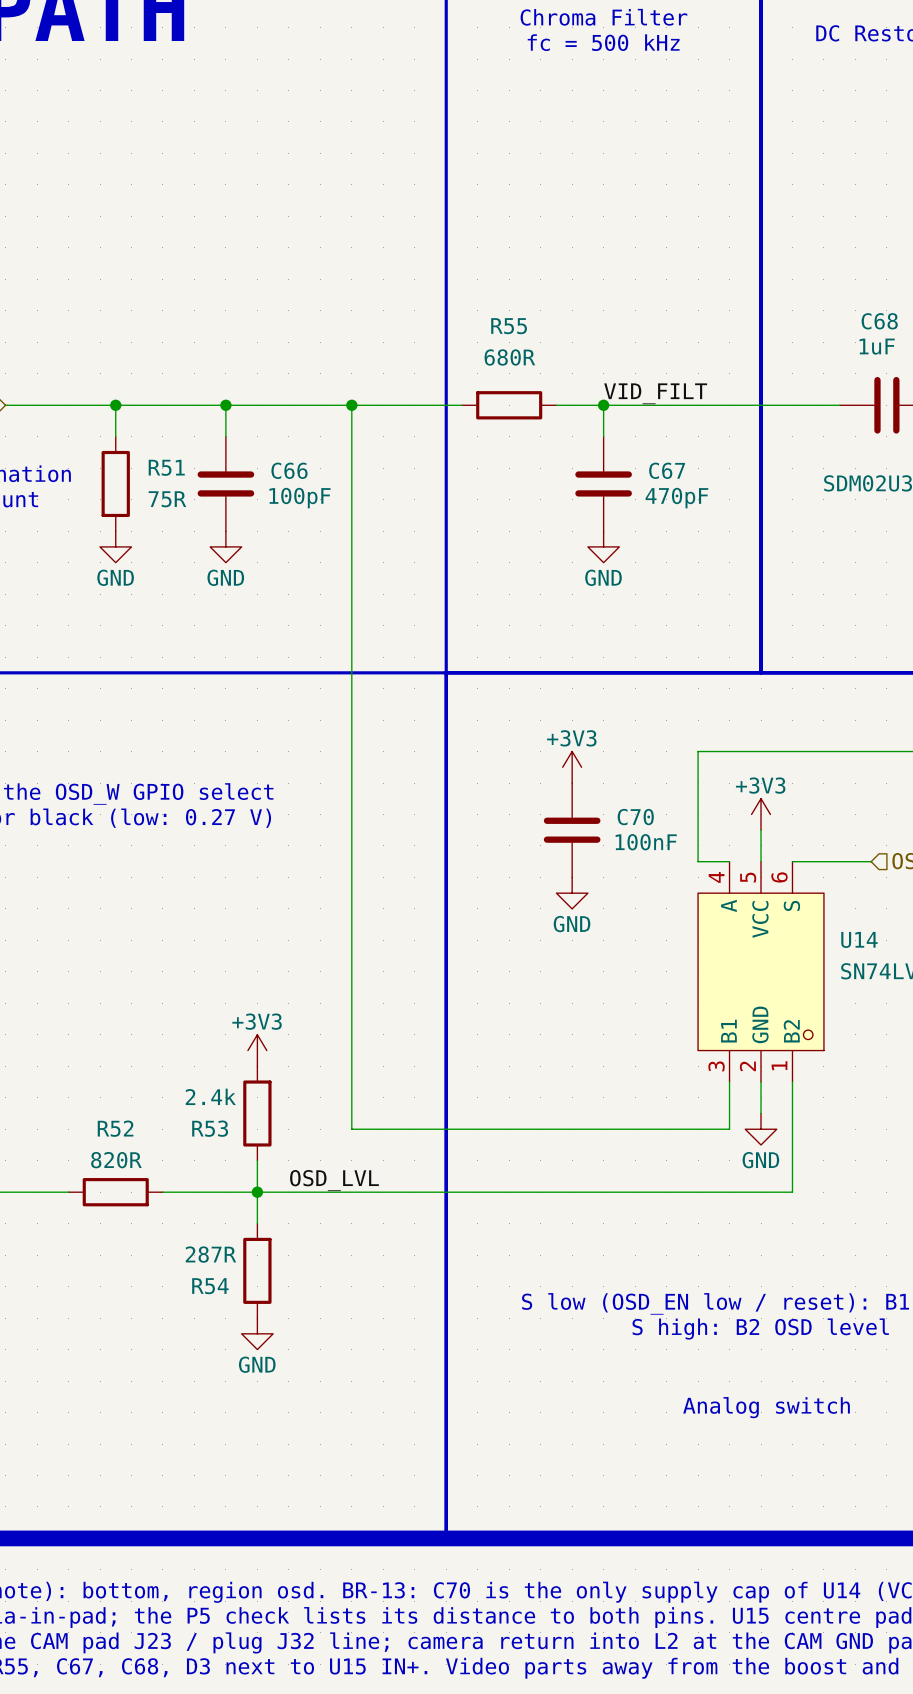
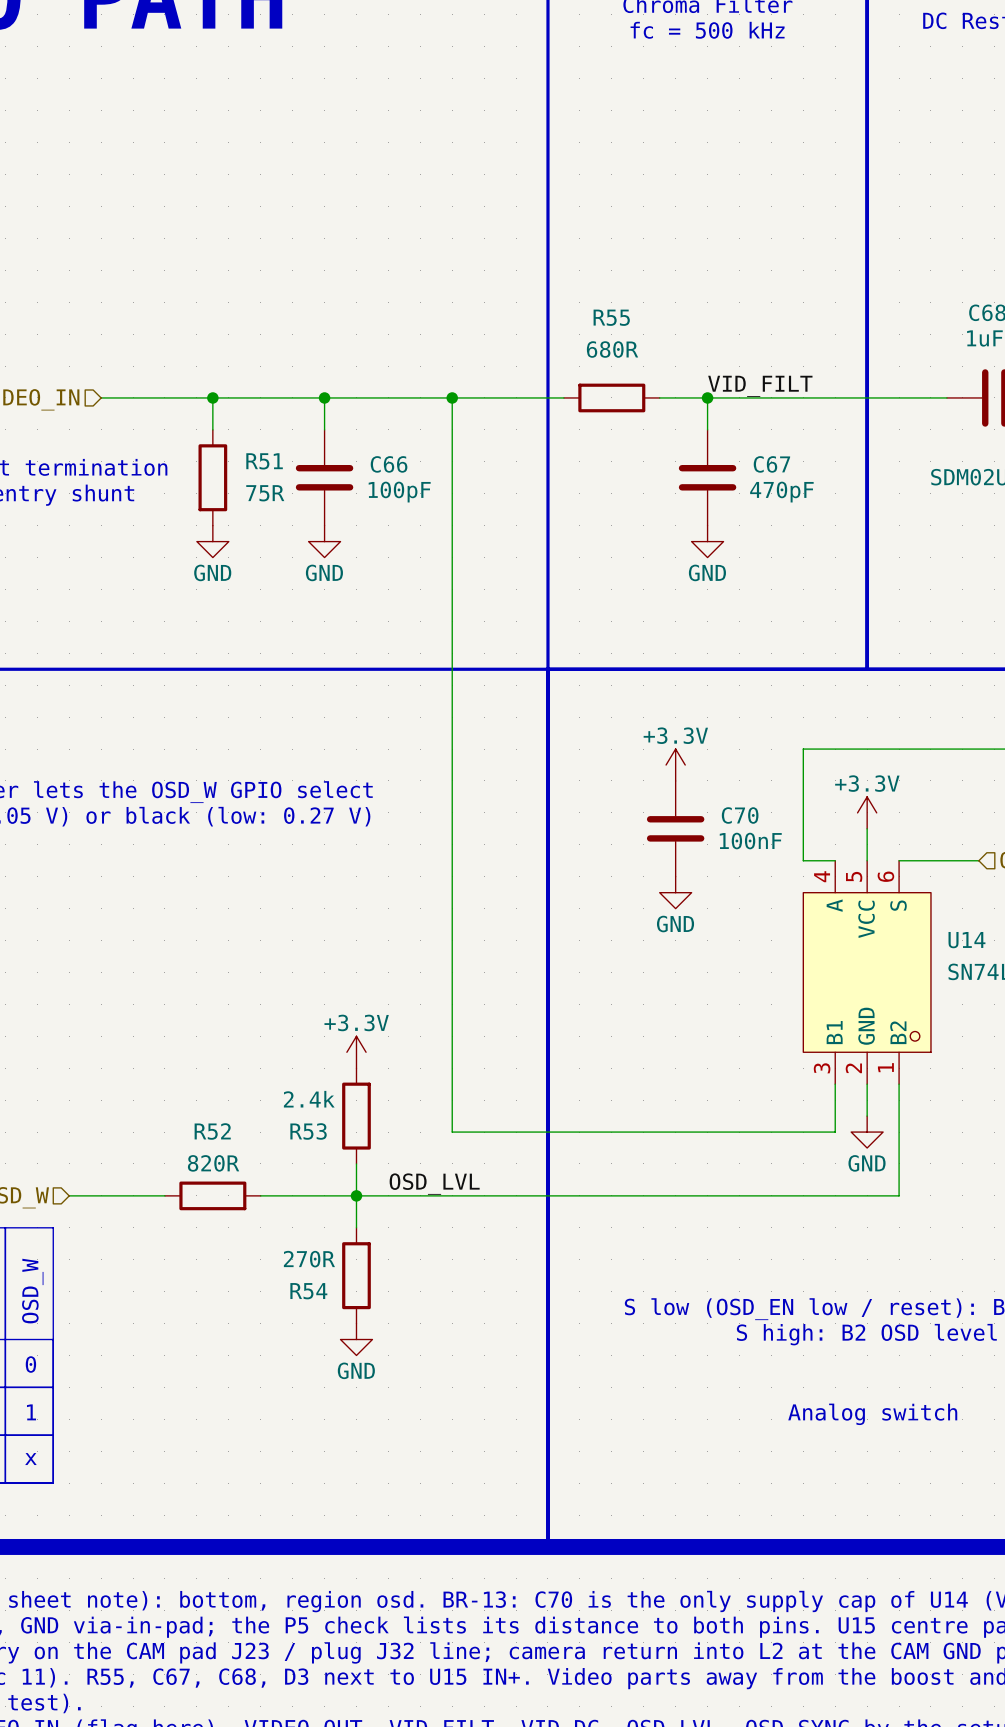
power symbol: +3V3 (572, 767) -> +3.3V (675, 765)
power symbol: +3V3 (761, 814) -> +3.3V (867, 812)
power symbol: +3V3 (257, 1050) -> +3.3V (356, 1052)
R54 value: 287R (210, 1254) -> 270R (309, 1259)

